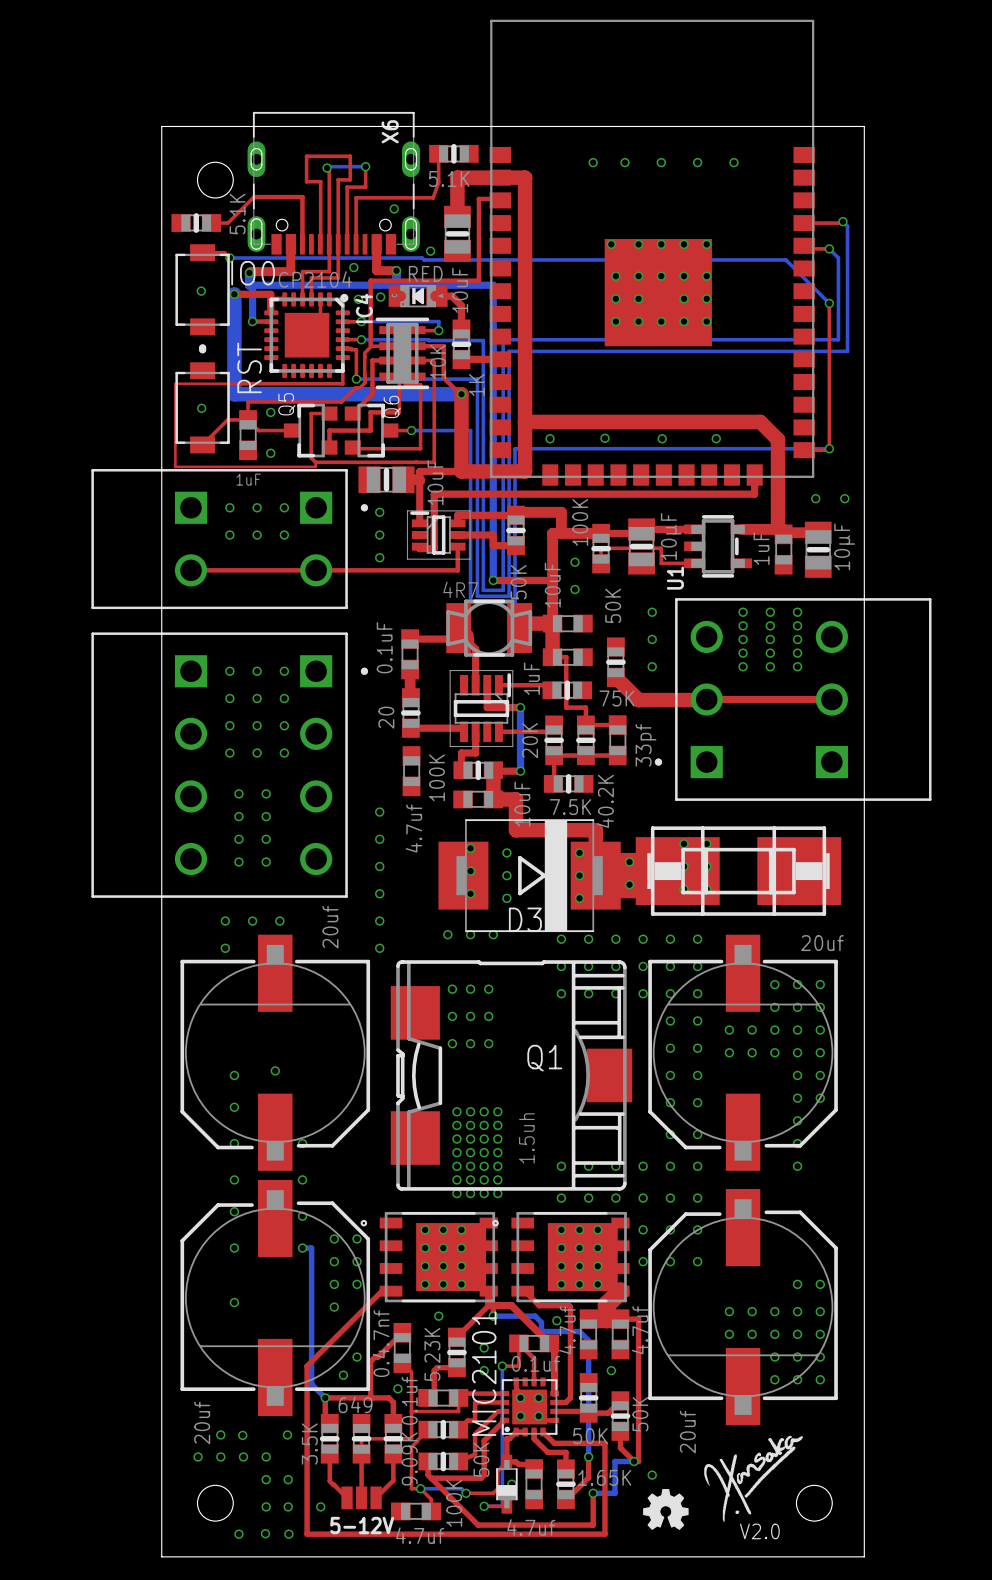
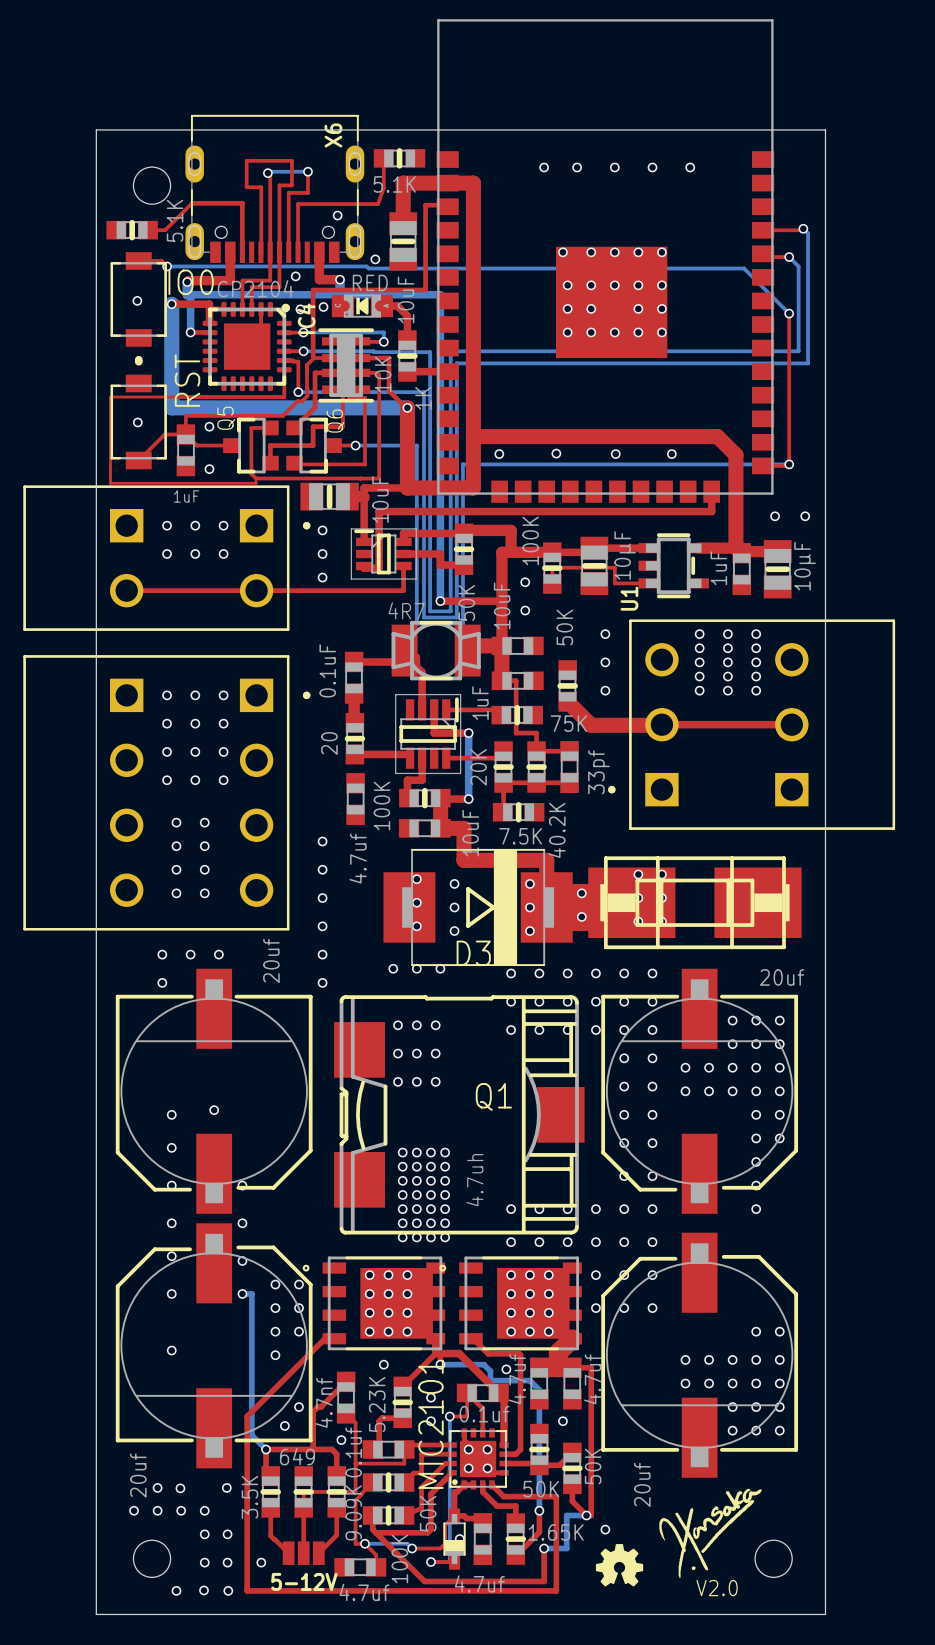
part value: 1.5uh (526, 1138) -> 4.7uh (474, 1180)
part value: 0.4.7nf (381, 1343) -> 4.7nf (324, 1402)

